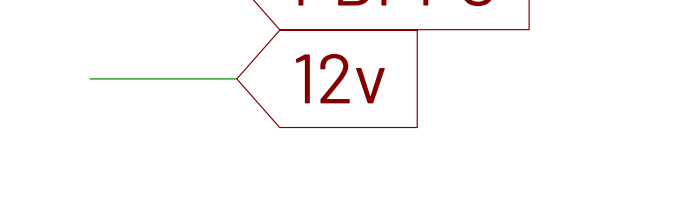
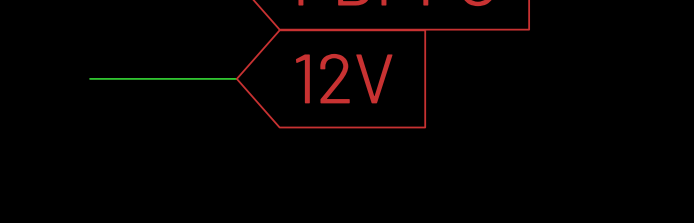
global label: 12v (340, 78) -> 12V (344, 78)

